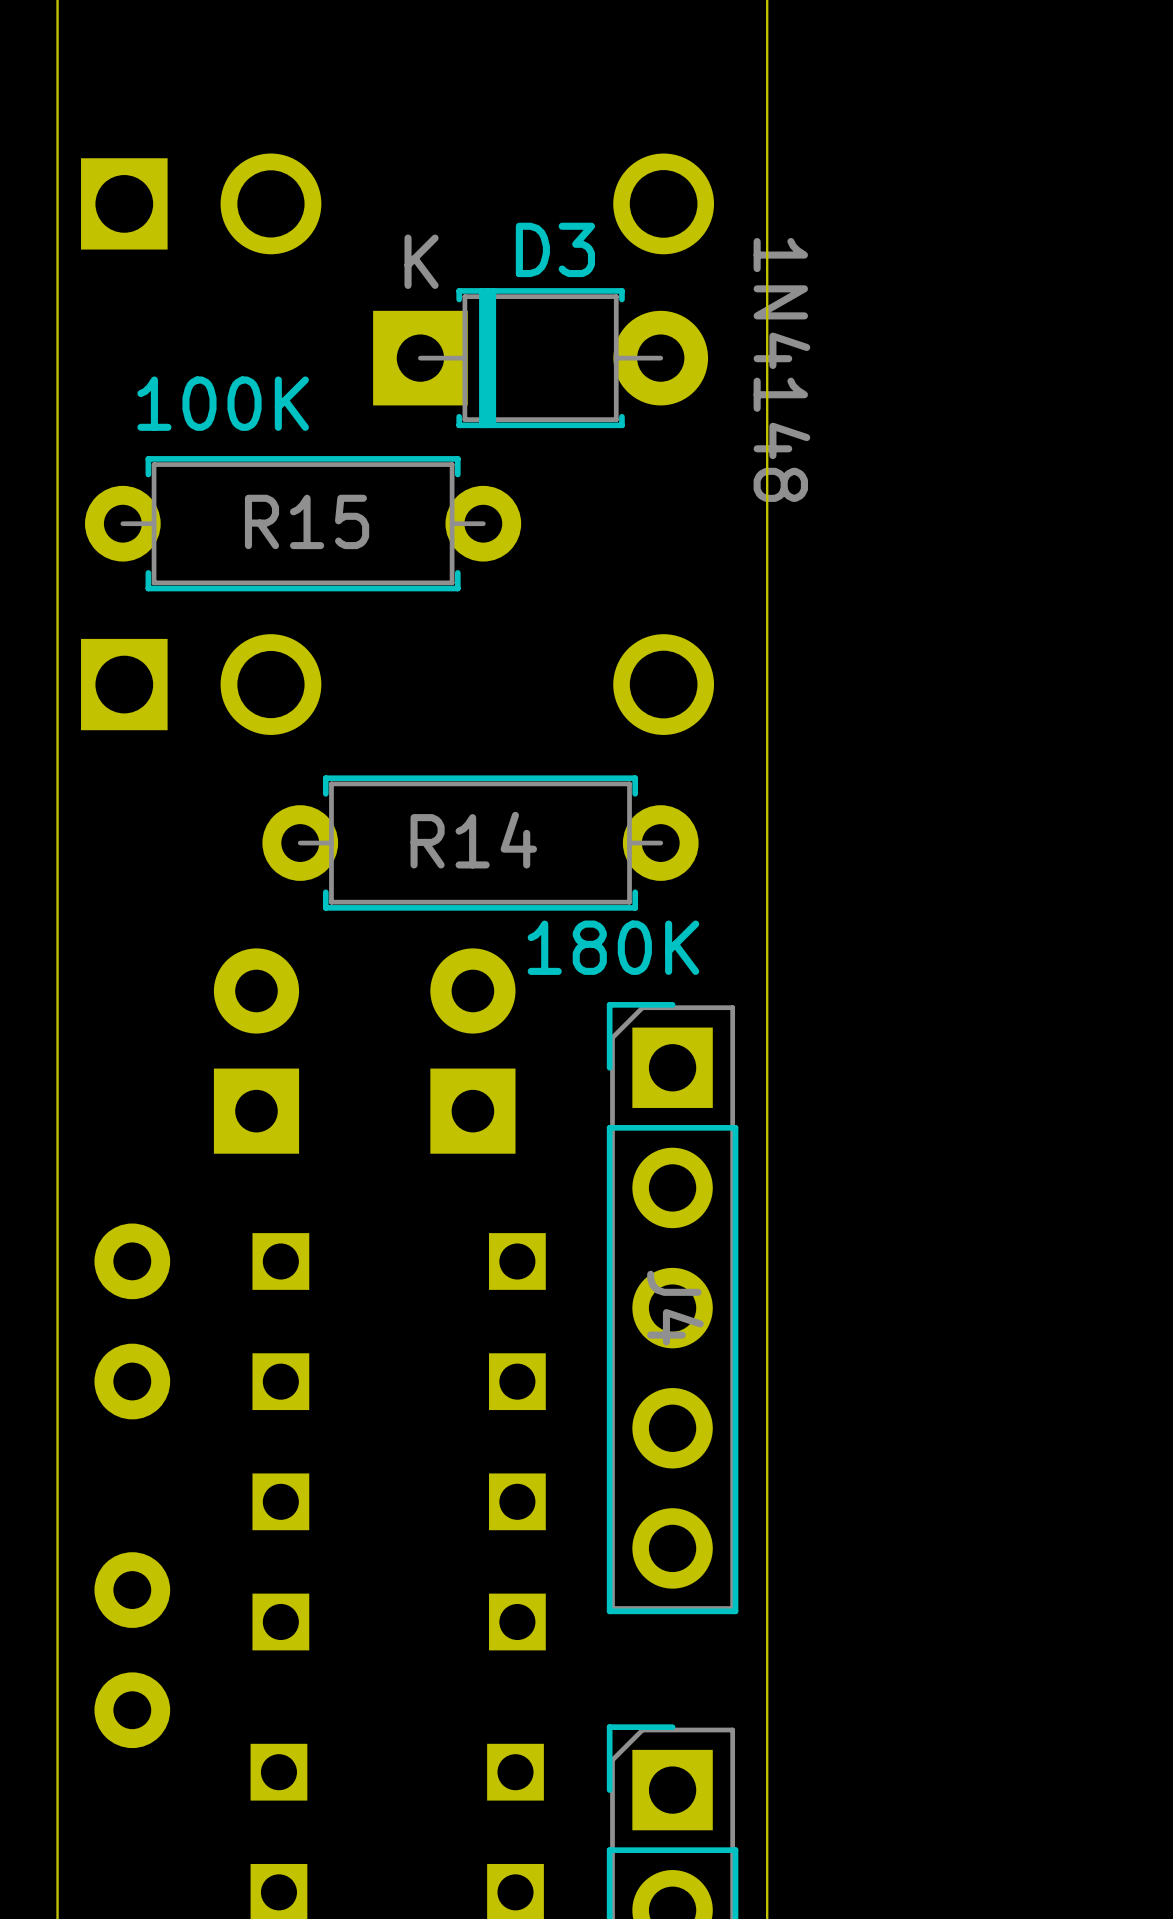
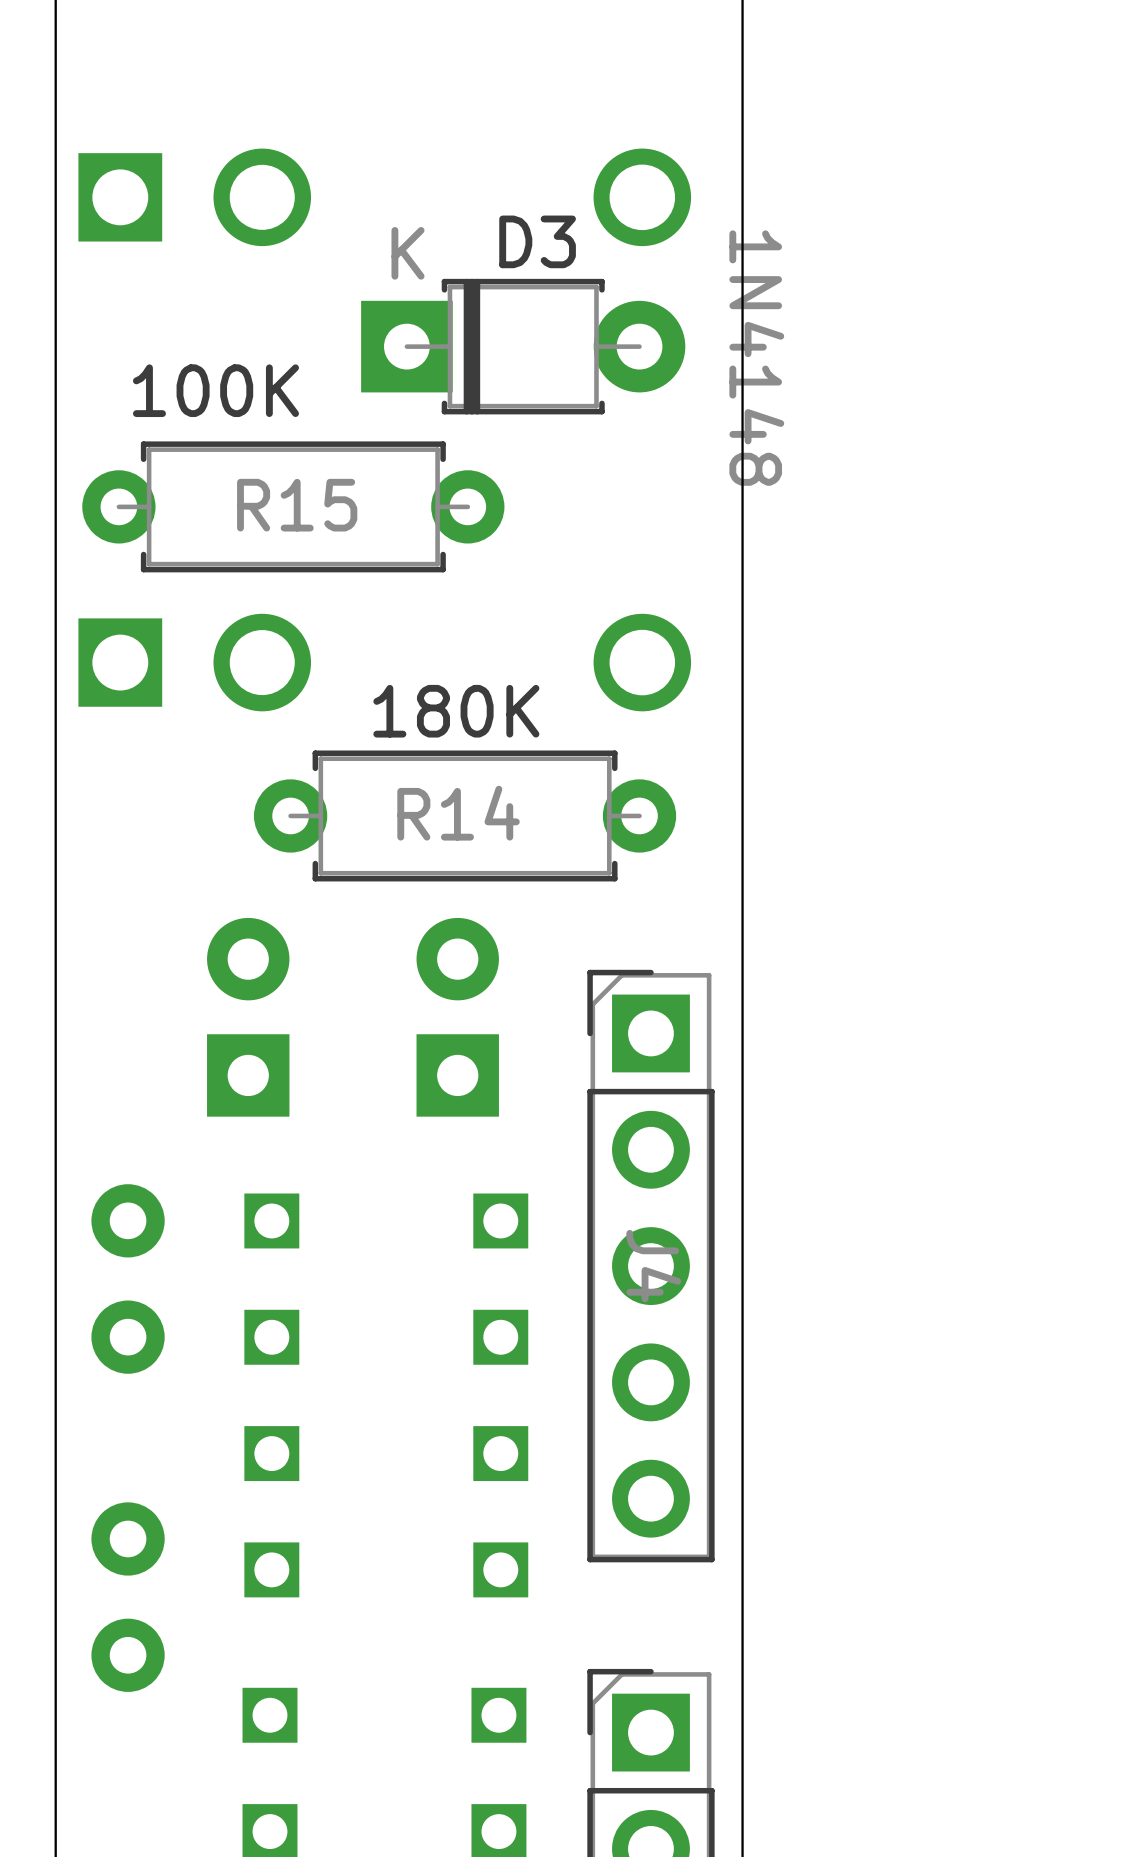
R14 value position: 180K (613, 947) -> 180K (456, 711)

